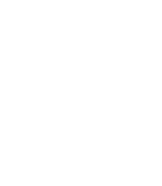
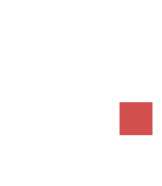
part: none -> (136, 118)

